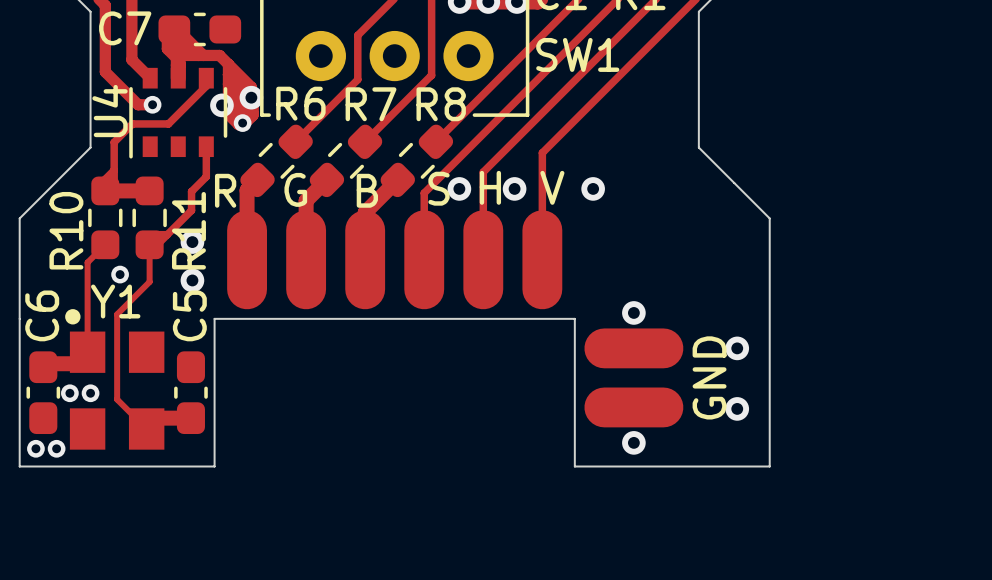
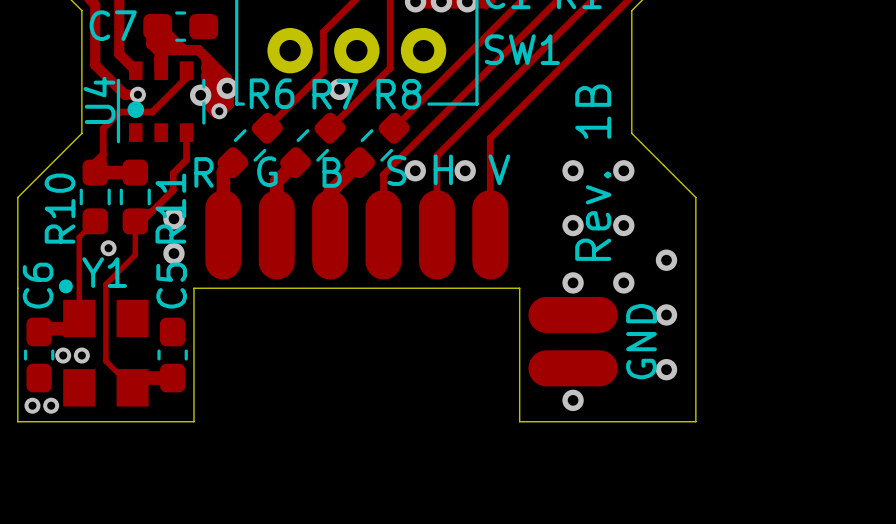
U4 footprint: [129, 67, 228, 159] -> [116, 61, 206, 144]
via: none -> (339, 89)
via: (593, 188) -> none
via: none -> (573, 170)
via: none -> (623, 170)
text: none -> Rev. 1B (593, 172)
via: none -> (573, 225)
via: none -> (623, 225)
via: none -> (666, 260)
via: none -> (623, 282)

